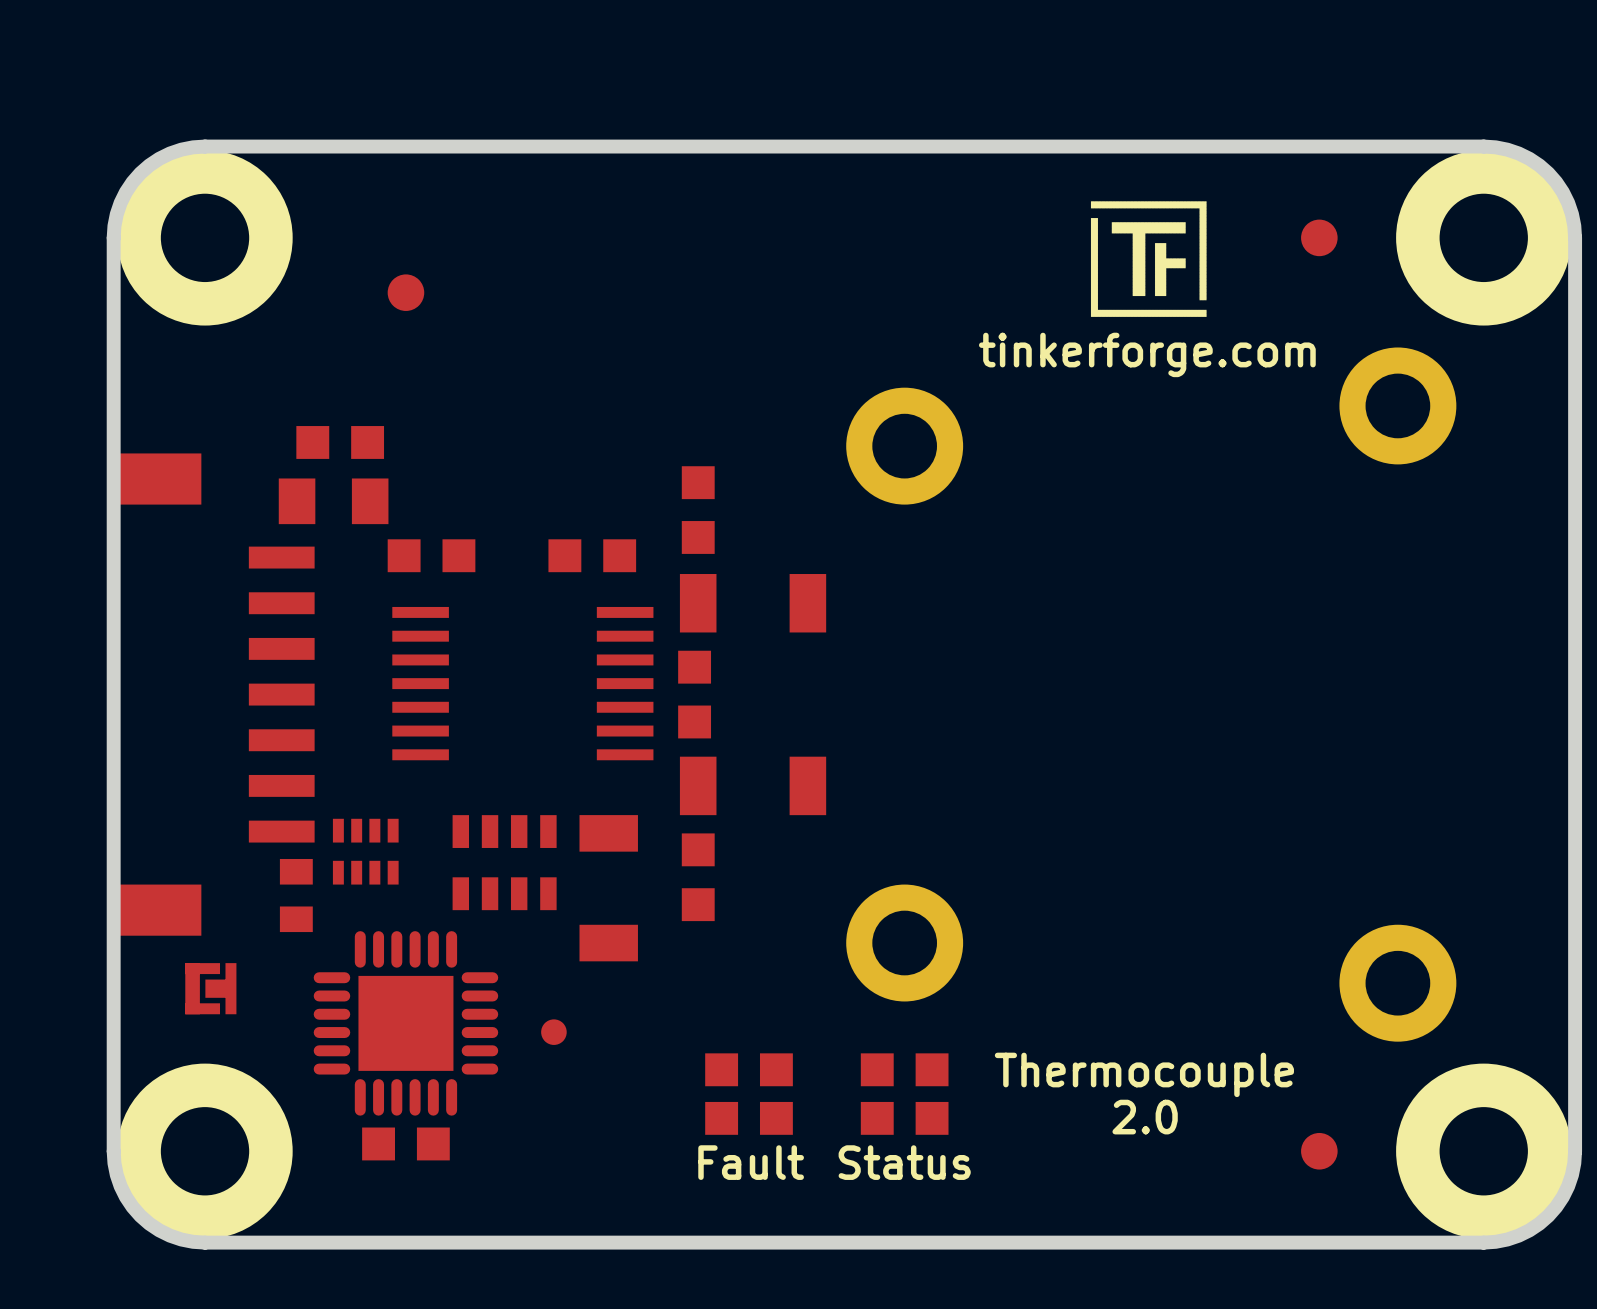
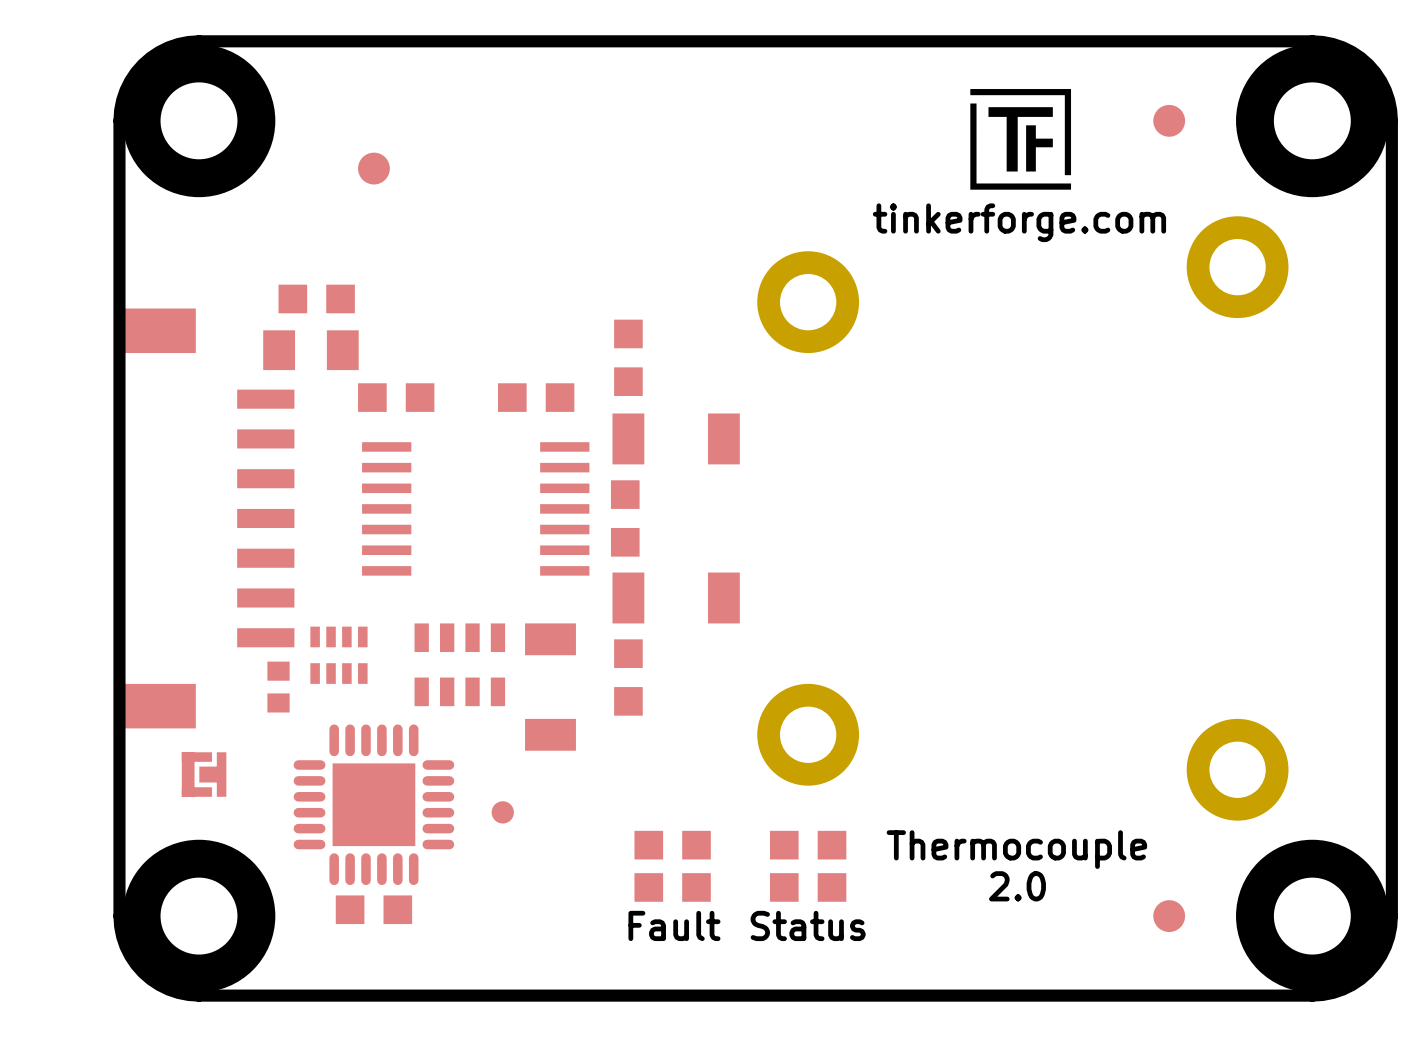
part footprint: [279, 858, 313, 933] -> [267, 661, 290, 713]

